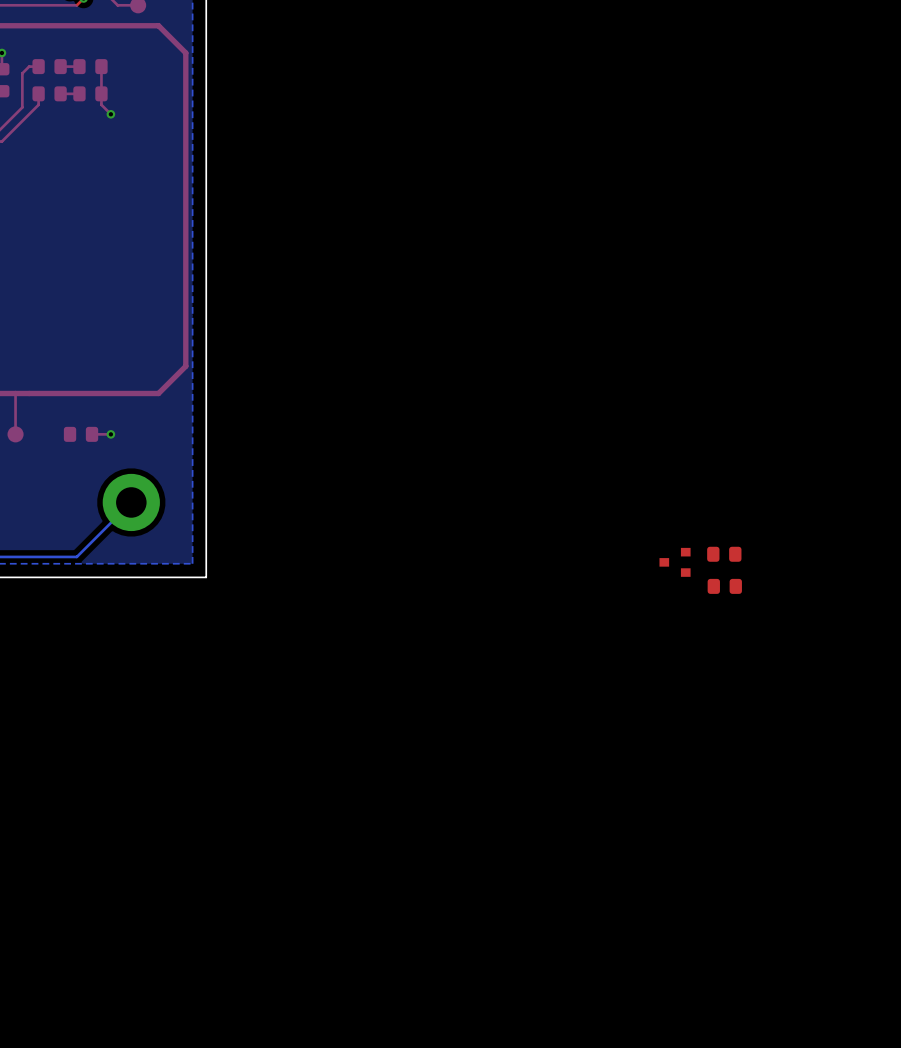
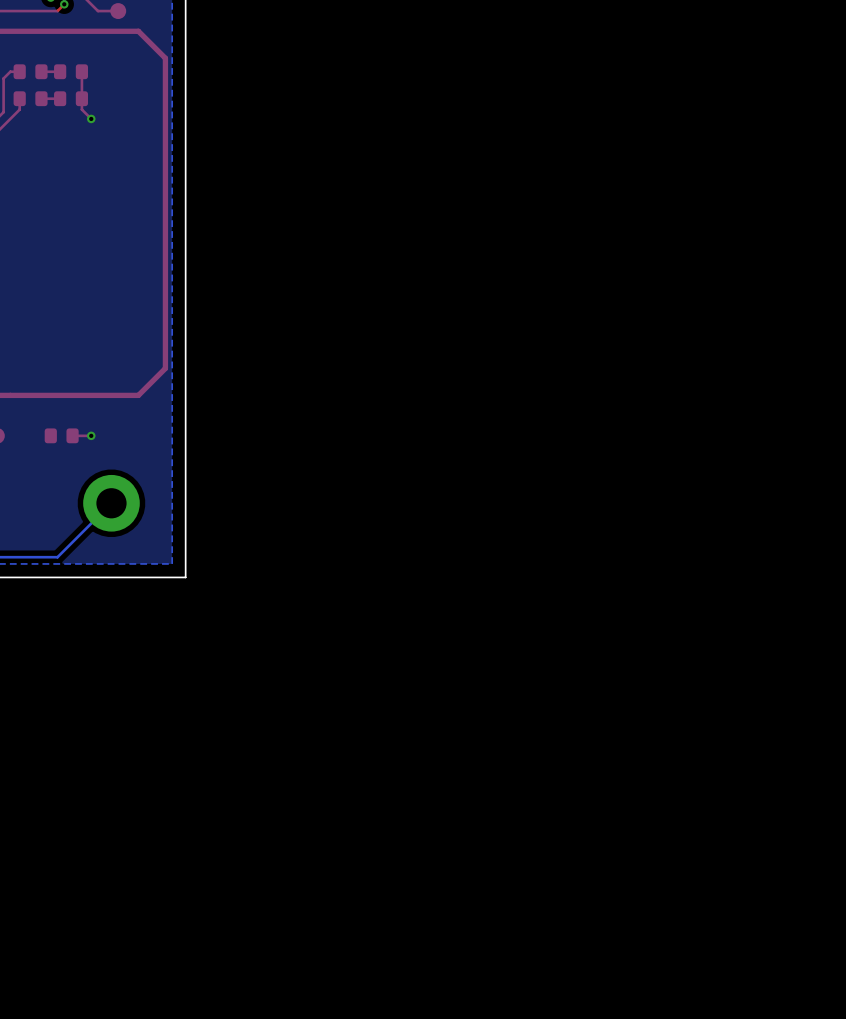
part: (724, 554) -> none
part: (675, 562) -> none
part: (724, 586) -> none

